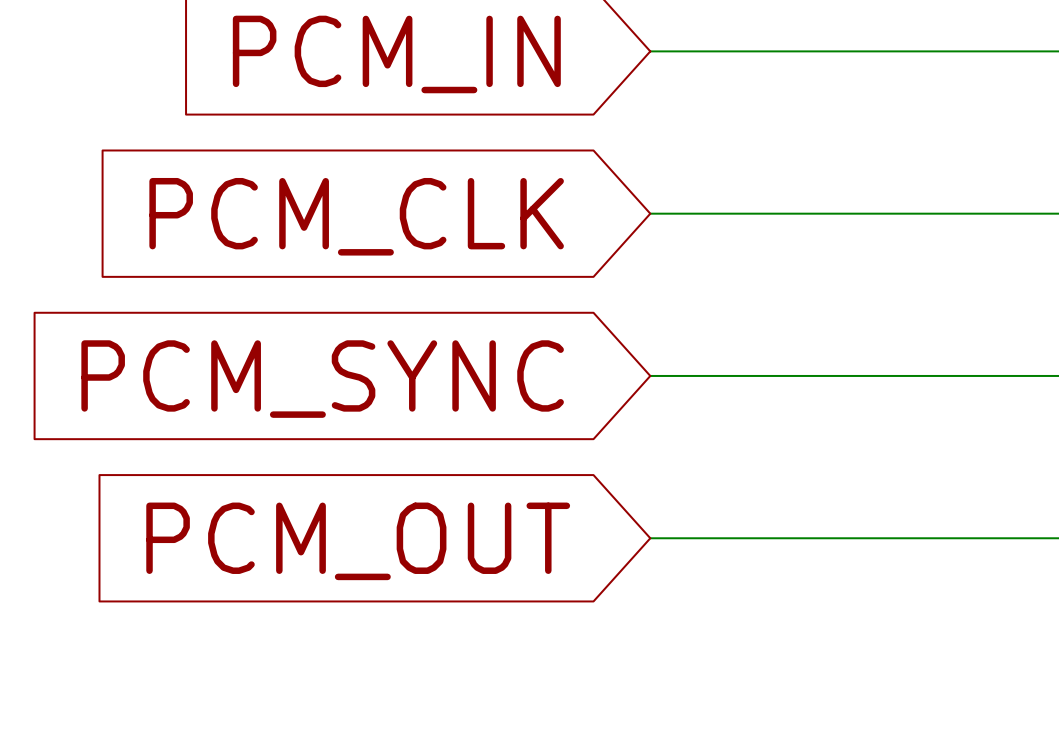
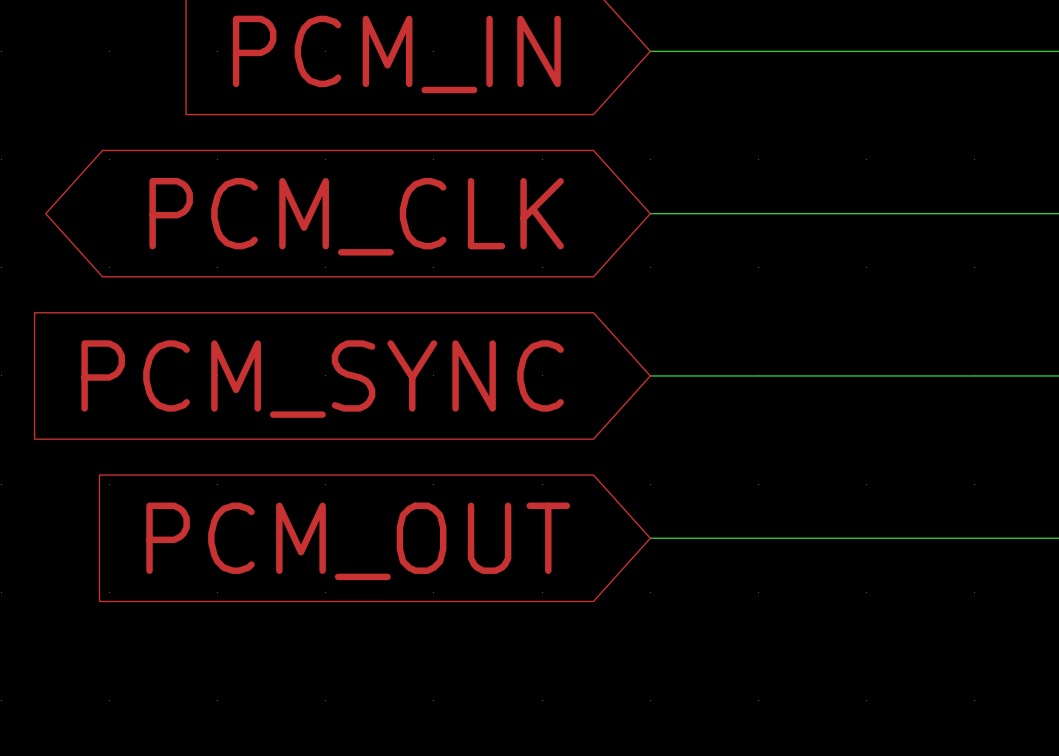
global label shape: input (356, 216) -> bidirectional (356, 216)

